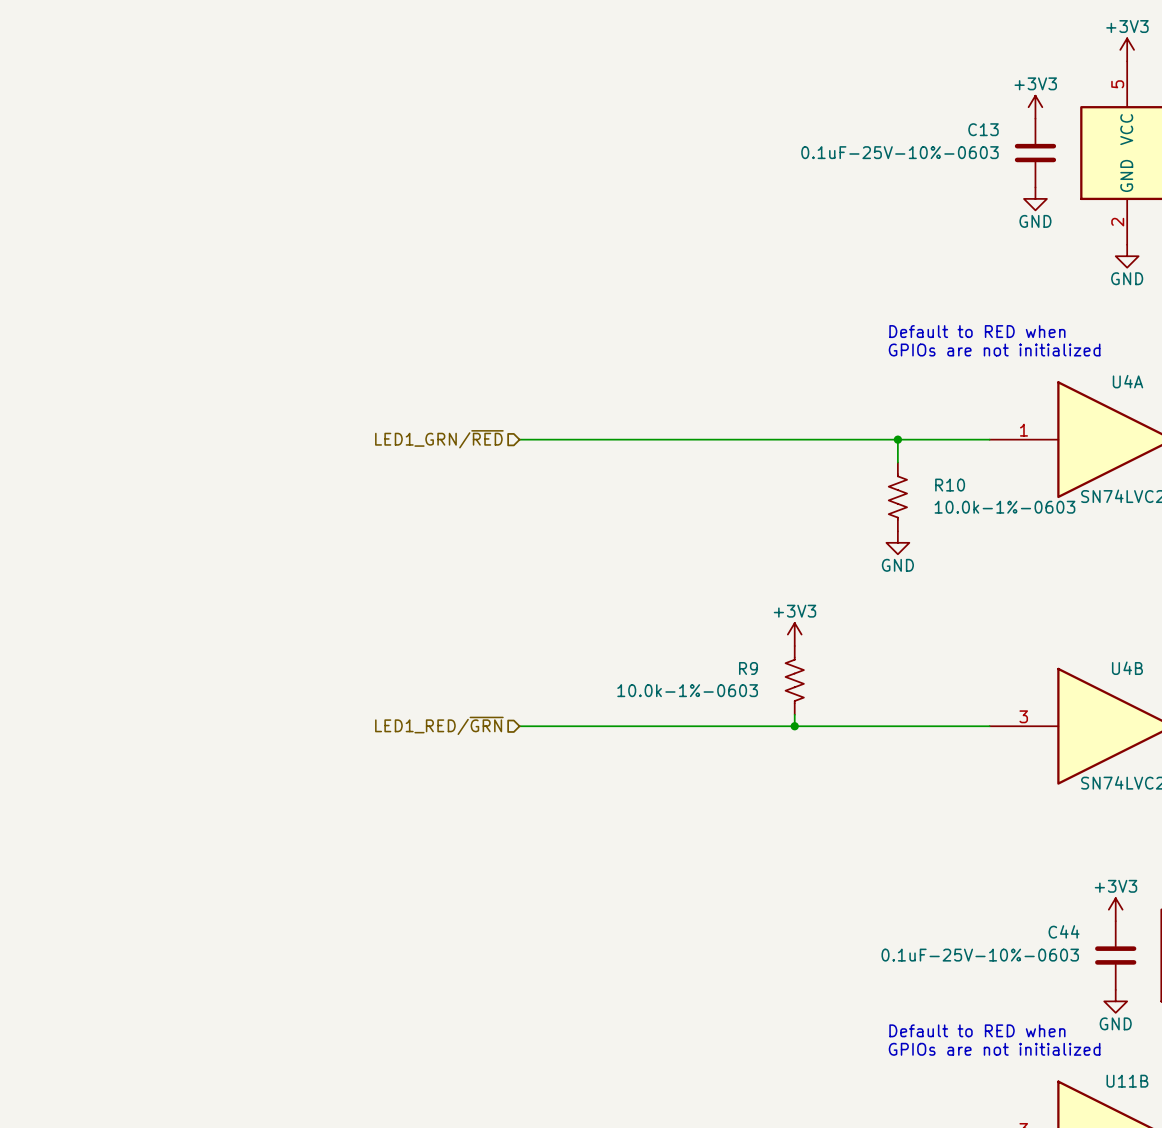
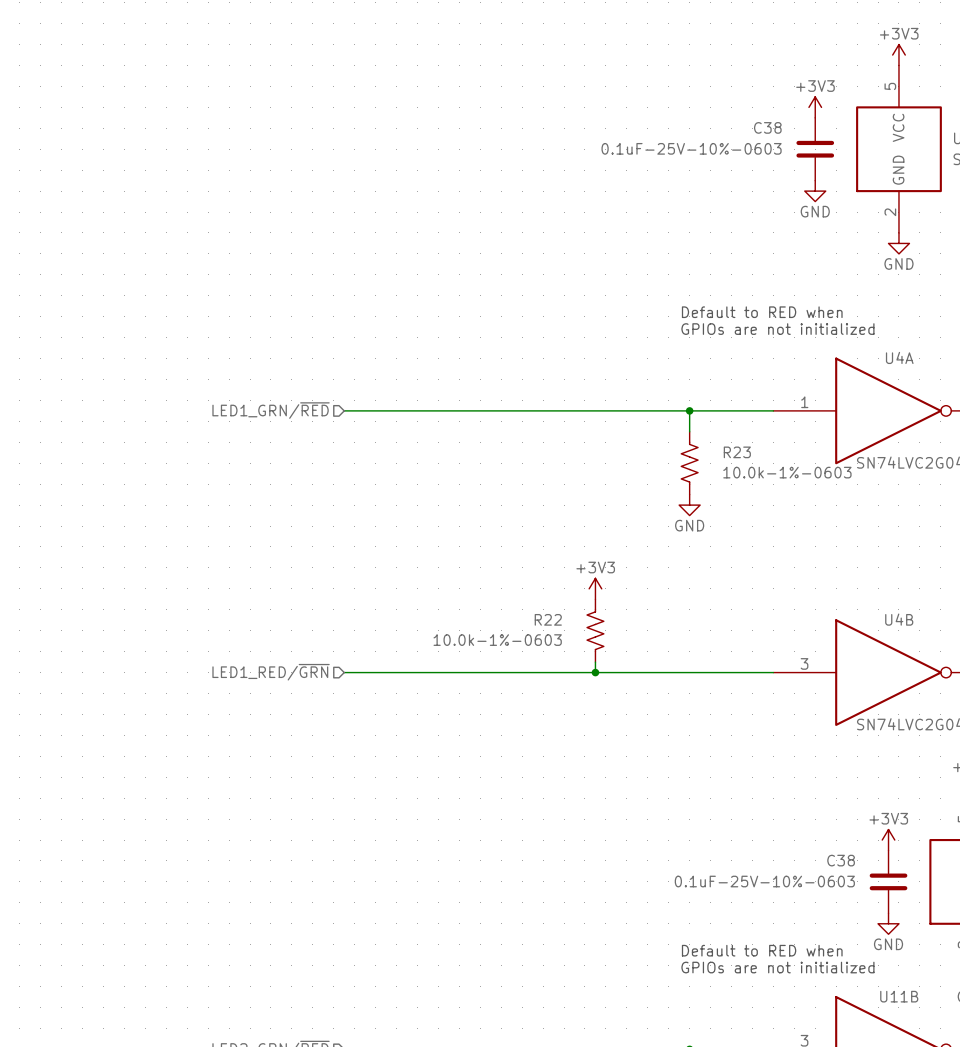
C13 name: C13 (983, 129) -> C38 (767, 127)
R10 name: R10 (950, 485) -> R23 (737, 452)
R9 name: R9 (748, 668) -> R22 (548, 619)
C44 name: C44 (1064, 931) -> C38 (841, 860)

